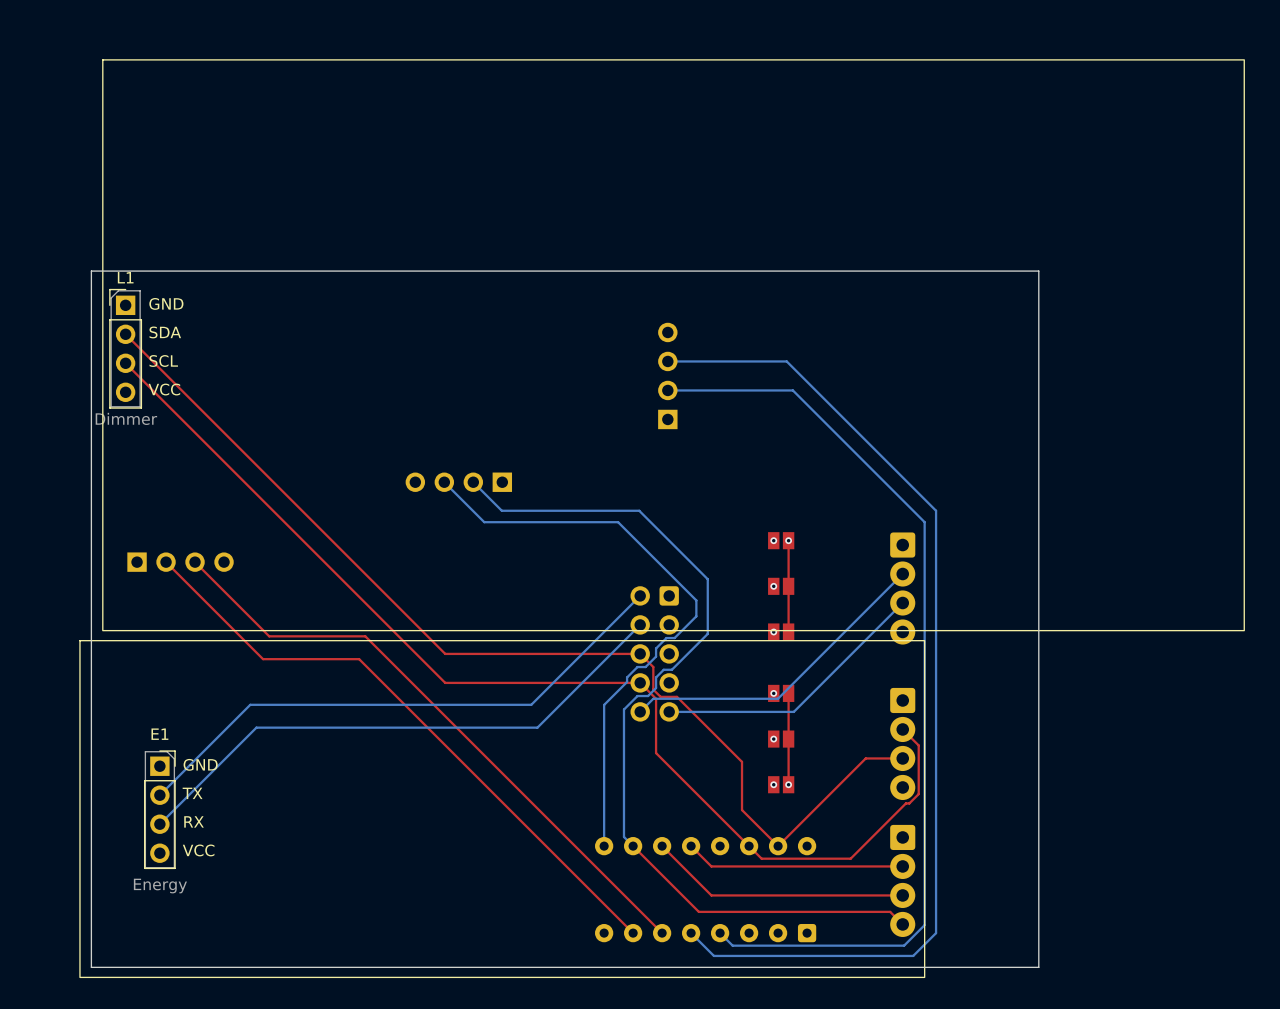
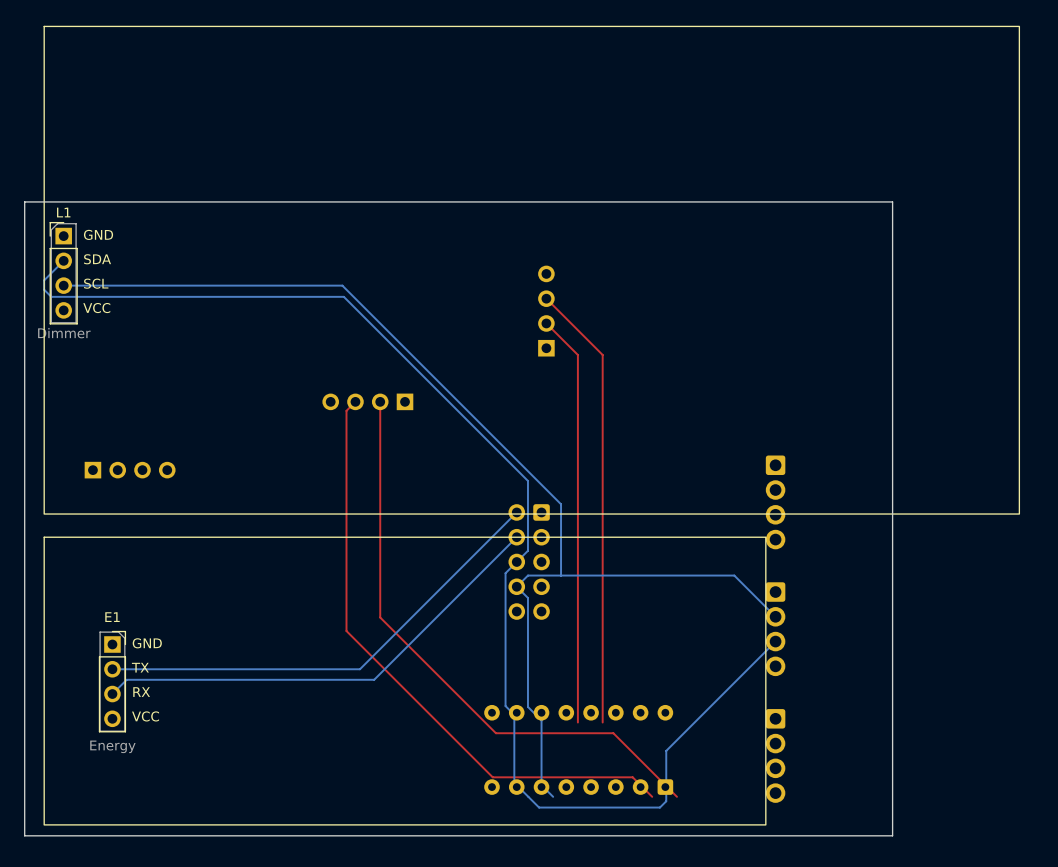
board edge: (1038, 271) (91, 271) (91, 967) (1038, 967) (1038, 271) -> (892, 201) (892, 835) (24, 835) (24, 201) (892, 201)
bottom track: none -> (63, 260) (44, 280) (44, 289) (51, 296) (343, 296) (527, 480) (527, 550) (505, 573) (505, 706) (514, 714) (514, 782) (539, 807) (659, 807) (666, 801) (666, 750) (775, 641)
top track: (125, 334) (445, 653) (640, 653) (653, 667) (653, 689) (660, 696) (677, 696) (742, 761) (742, 810) (778, 846) (865, 758) (902, 758) -> none
L1 position: (673, 345) -> (531, 270)
bottom track: none -> (63, 285) (342, 285) (561, 504) (561, 575)
bottom track: (667, 361) (786, 361) (936, 510) (936, 933) (913, 955) (713, 955) (691, 933) -> none
top track: none -> (546, 298) (602, 354) (602, 722)
top track: (125, 363) (445, 682) (640, 682) (656, 698) (656, 753) (761, 858) (850, 858) (905, 803) (909, 803) (918, 794) (918, 745) (902, 729) -> none
bottom track: (667, 390) (792, 390) (924, 522) (924, 925) (904, 945) (732, 945) (720, 933) -> none
top track: none -> (546, 323) (577, 354) (577, 722)
bottom track: (444, 482) (484, 522) (618, 522) (696, 600) (696, 616) (674, 638) (666, 638) (656, 648) (656, 656) (645, 667) (637, 667) (627, 677) (627, 681) (604, 704) (604, 846) -> none
top track: none -> (355, 401) (346, 410) (346, 631) (492, 777) (632, 777) (652, 796)
bottom track: (473, 482) (501, 510) (639, 510) (707, 579) (707, 633) (671, 669) (663, 669) (656, 677) (656, 688) (648, 696) (637, 696) (623, 709) (623, 837) (633, 846) -> none
top track: none -> (380, 401) (380, 617) (495, 733) (613, 733) (676, 796)
via: (773, 540) -> none
part: (781, 540) -> none
top track: (788, 540) (788, 631) -> none
via: (788, 540) -> none
top track: (166, 562) (263, 659) (359, 659) (633, 933) -> none
top track: (195, 562) (269, 636) (365, 636) (662, 933) -> none
bottom track: (902, 574) (777, 698) (653, 698) (640, 711) -> none
via: (773, 586) -> none
part: (781, 586) -> none
part: (902, 588) -> none
bottom track: (640, 595) (531, 704) (250, 704) (159, 795) -> (516, 512) (359, 669) (112, 669)
part: none -> (775, 502)
bottom track: (902, 603) (793, 711) (669, 711) -> none
bottom track: (640, 624) (537, 727) (256, 727) (176, 807) -> (516, 537) (374, 679) (126, 679)
via: (773, 631) -> none
part: (781, 631) -> none
part position: (654, 653) -> (529, 561)
via: (773, 693) -> none
part: (781, 693) -> none
top track: (788, 693) (788, 784) -> none
bottom track: none -> (775, 616) (734, 575) (527, 575) (516, 586) (527, 597) (527, 706) (541, 720) (541, 785) (553, 796)
via: (773, 739) -> none
part: (781, 739) -> none
part: (902, 743) -> none
part: none -> (775, 629)
via: (773, 784) -> none
part: (781, 784) -> none
via: (788, 784) -> none
top track: (633, 846) (698, 911) (890, 911) (902, 924) -> none
top track: (662, 846) (711, 895) (902, 895) -> none
top track: (691, 846) (711, 866) (902, 866) -> none
part: (902, 880) -> none
part: none -> (775, 755)

